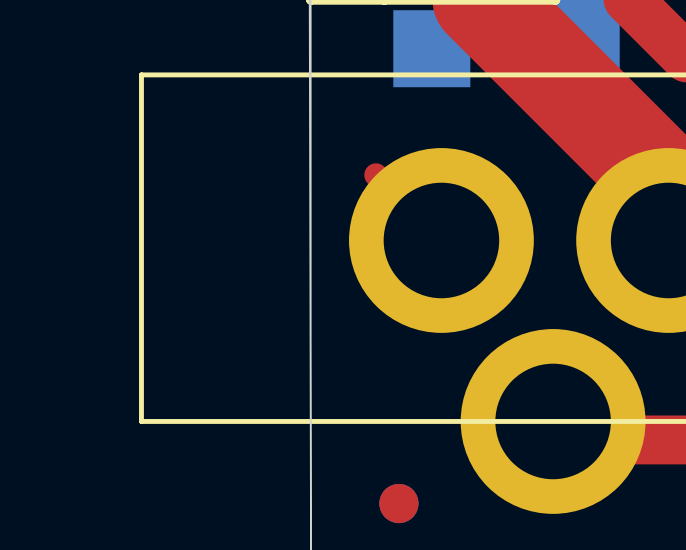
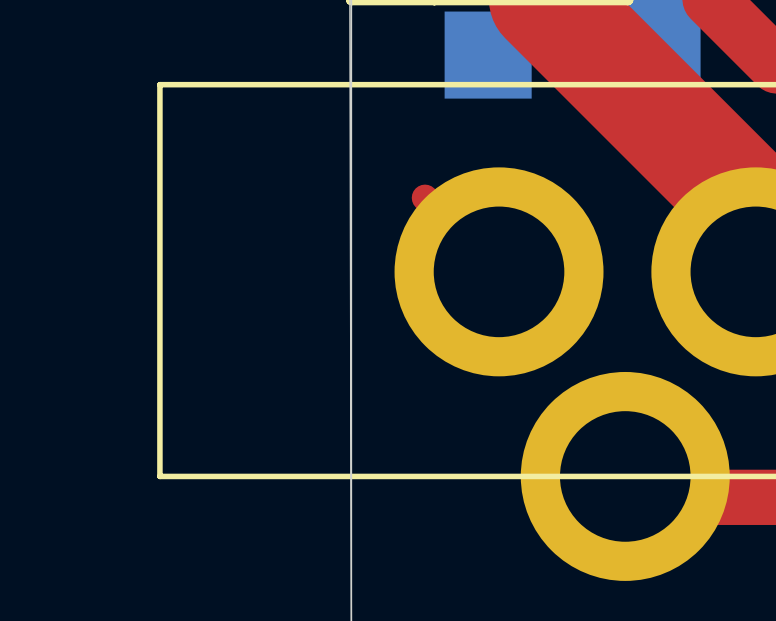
part: (398, 503) -> none

